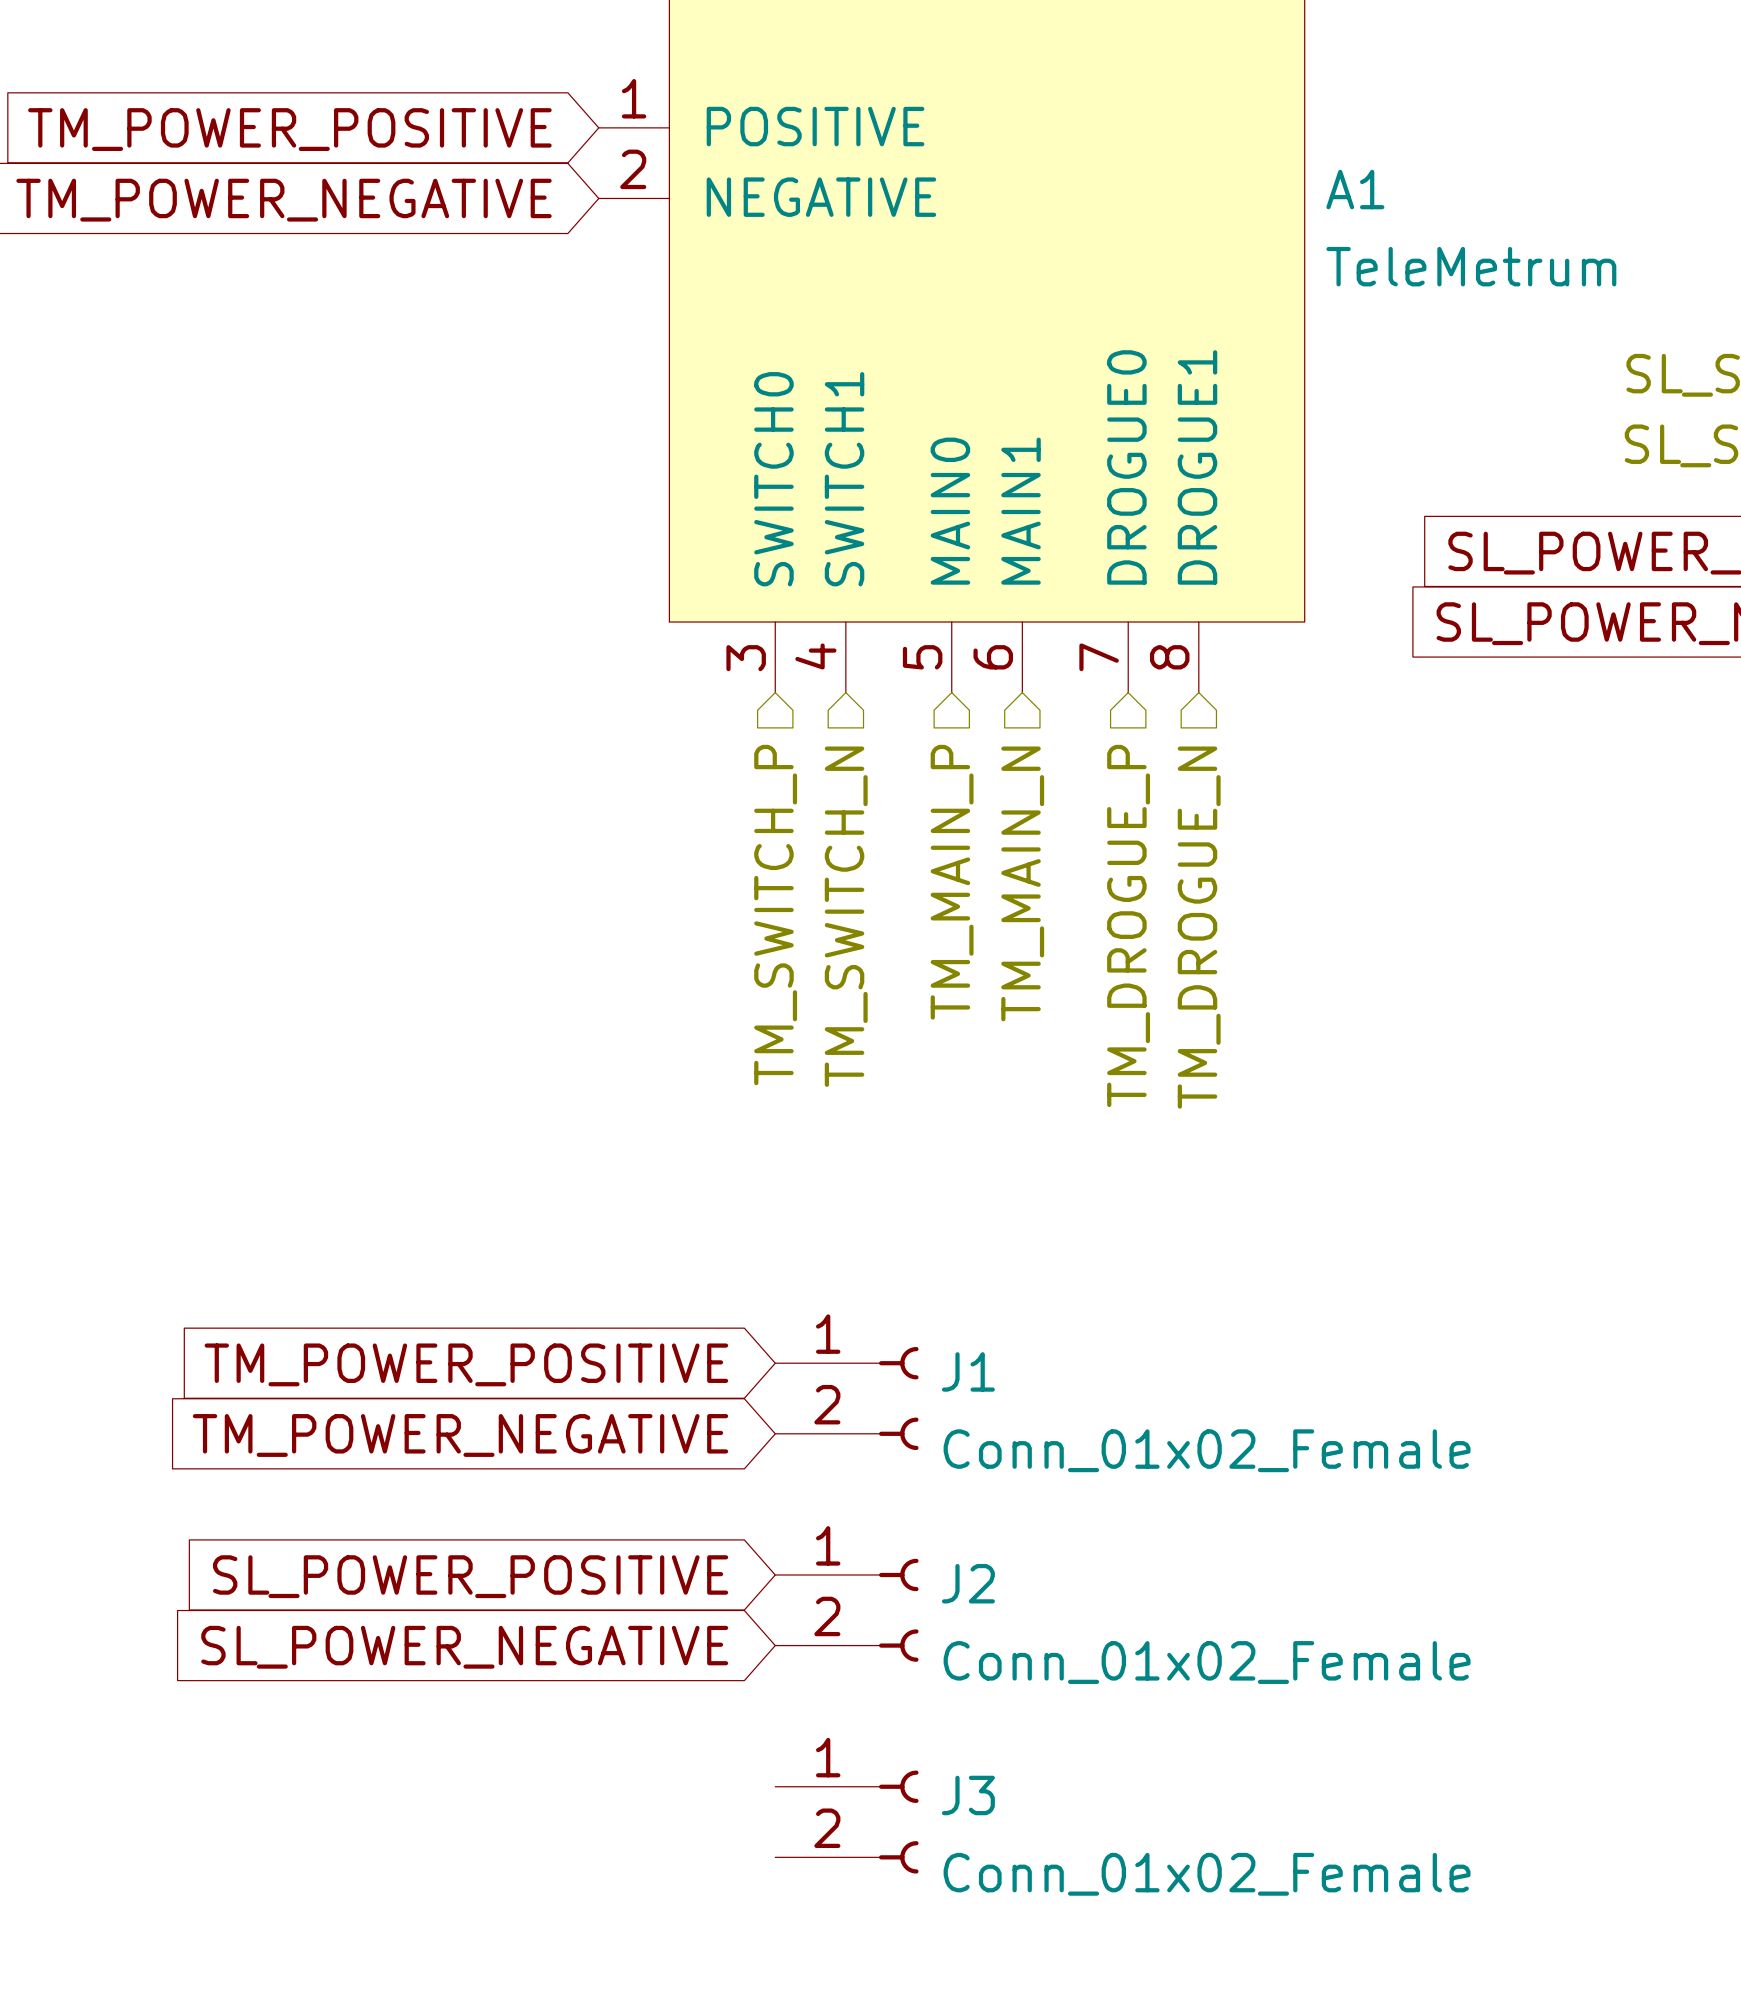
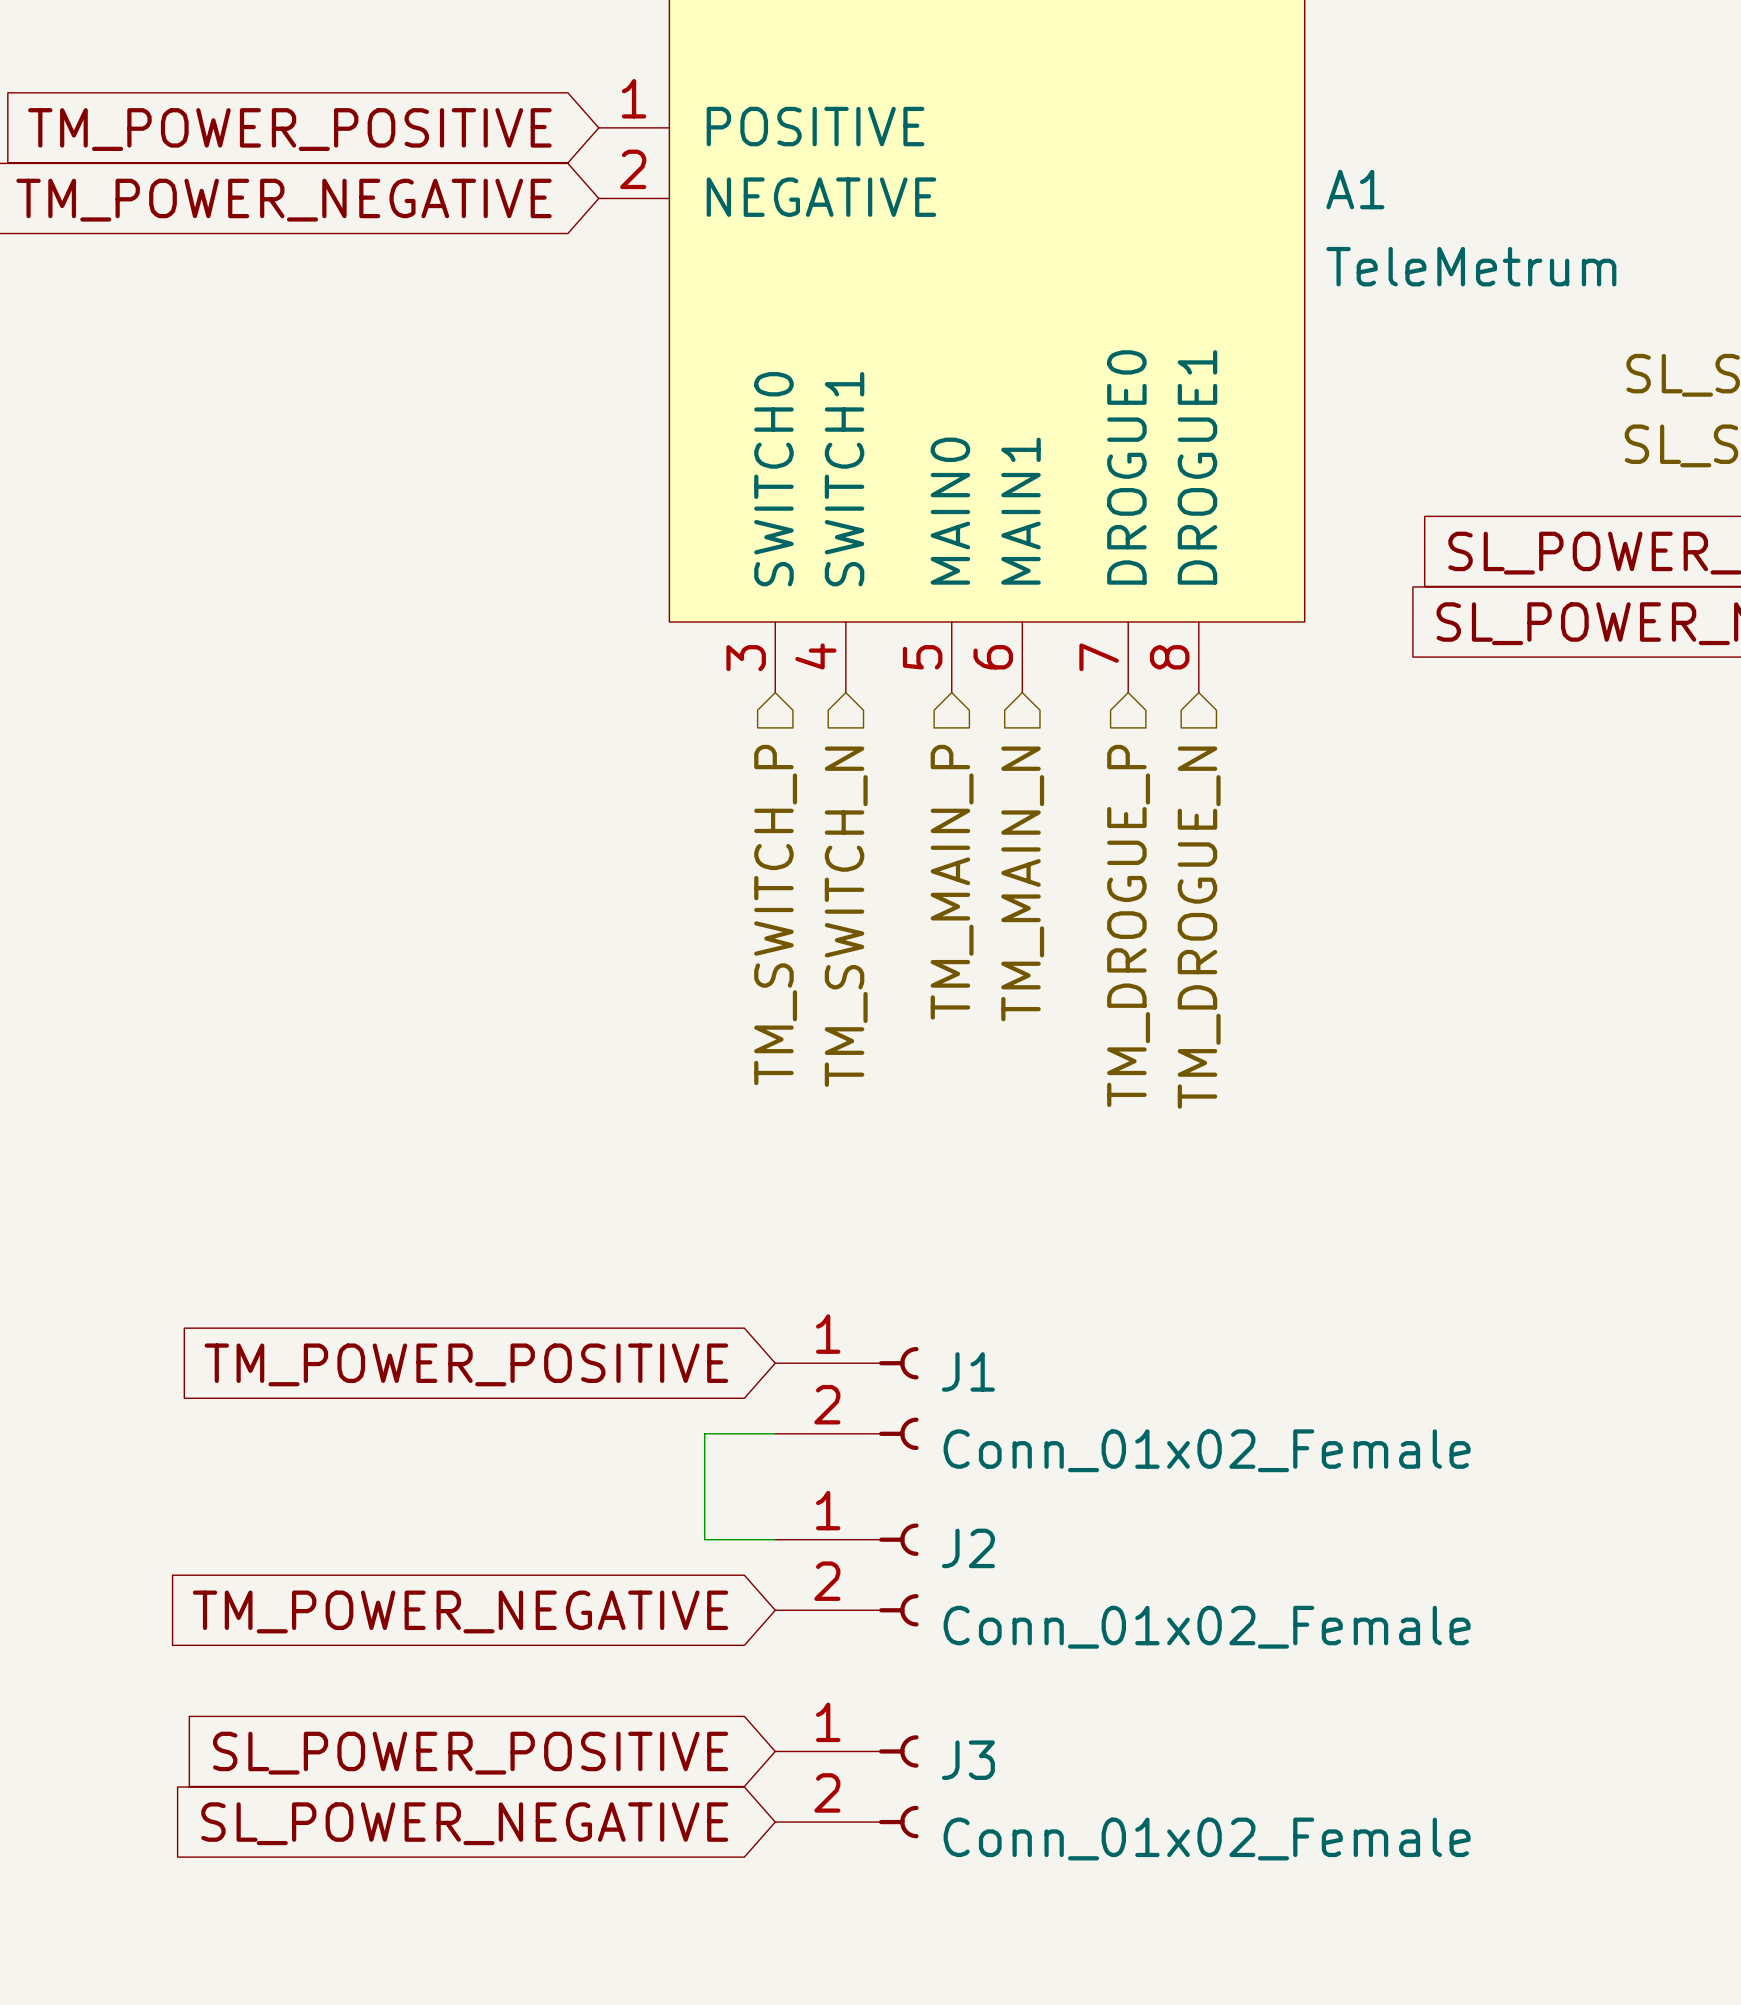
wire: none -> (775, 1433) (704, 1433) (704, 1539) (775, 1539)
global label position: TM_POWER_NEGATIVE (460, 1435) -> TM_POWER_NEGATIVE (460, 1611)
global label position: SL_POWER_POSITIVE (470, 1576) -> SL_POWER_POSITIVE (470, 1753)
J2 position: (846, 1610) -> (846, 1574)
global label position: SL_POWER_NEGATIVE (464, 1647) -> SL_POWER_NEGATIVE (464, 1823)
J3 position: (846, 1822) -> (846, 1786)

